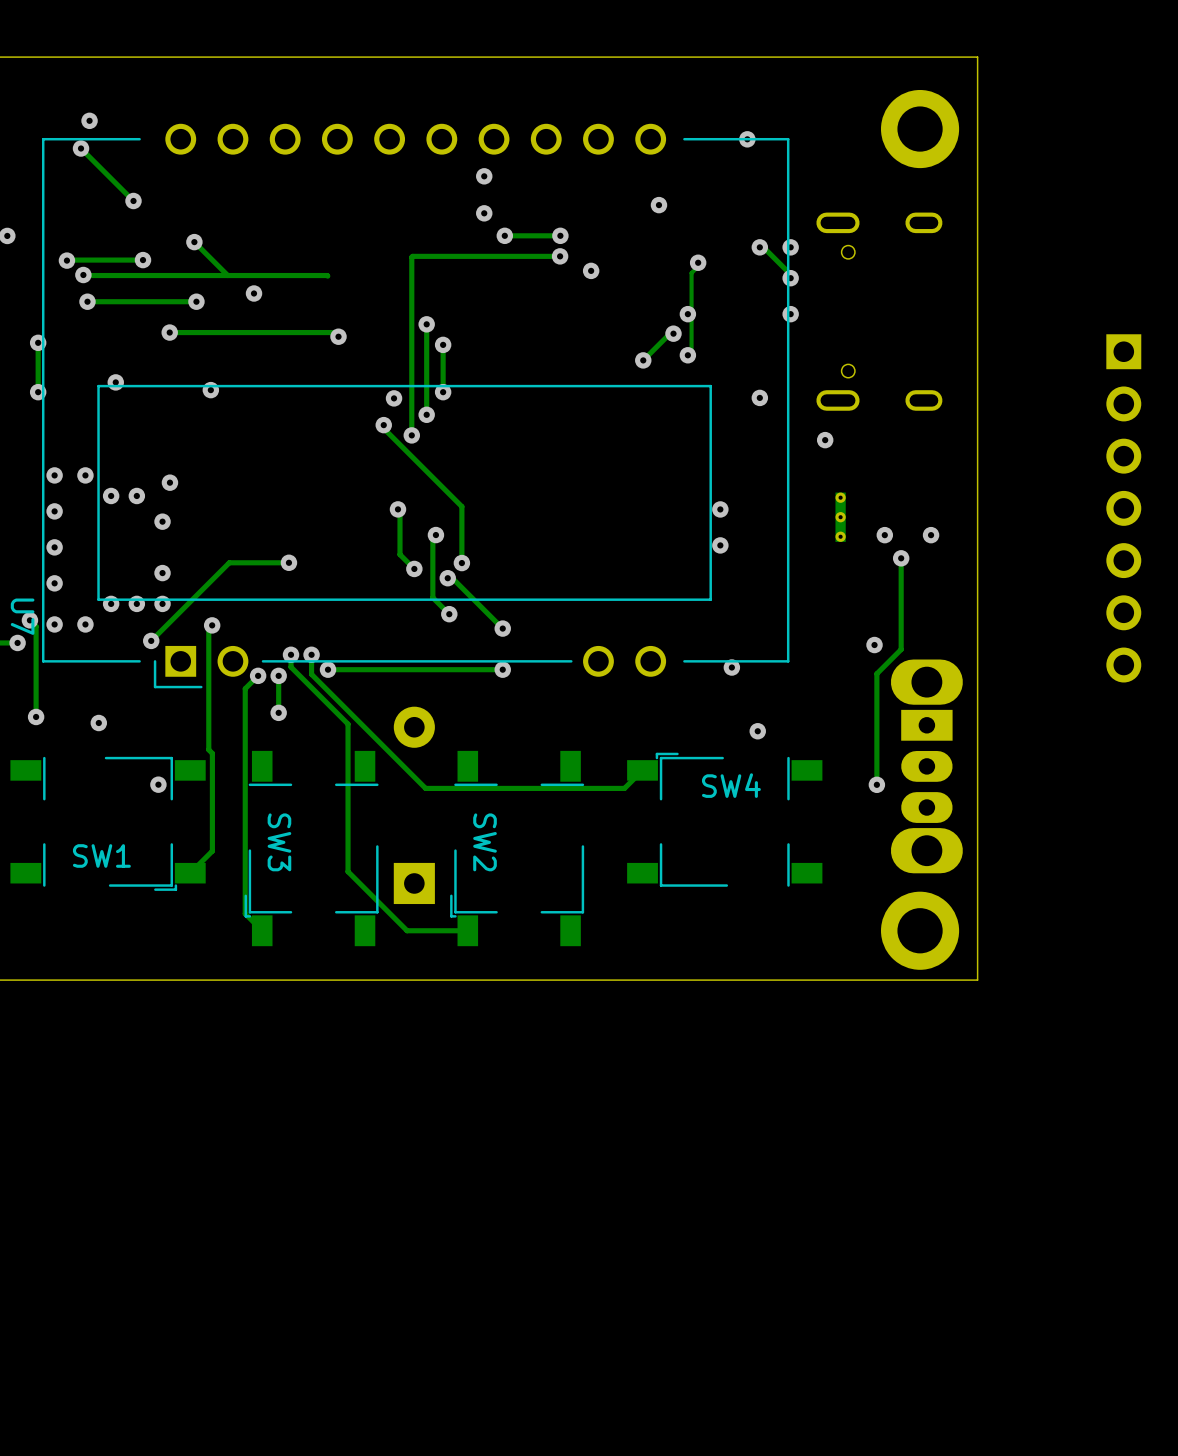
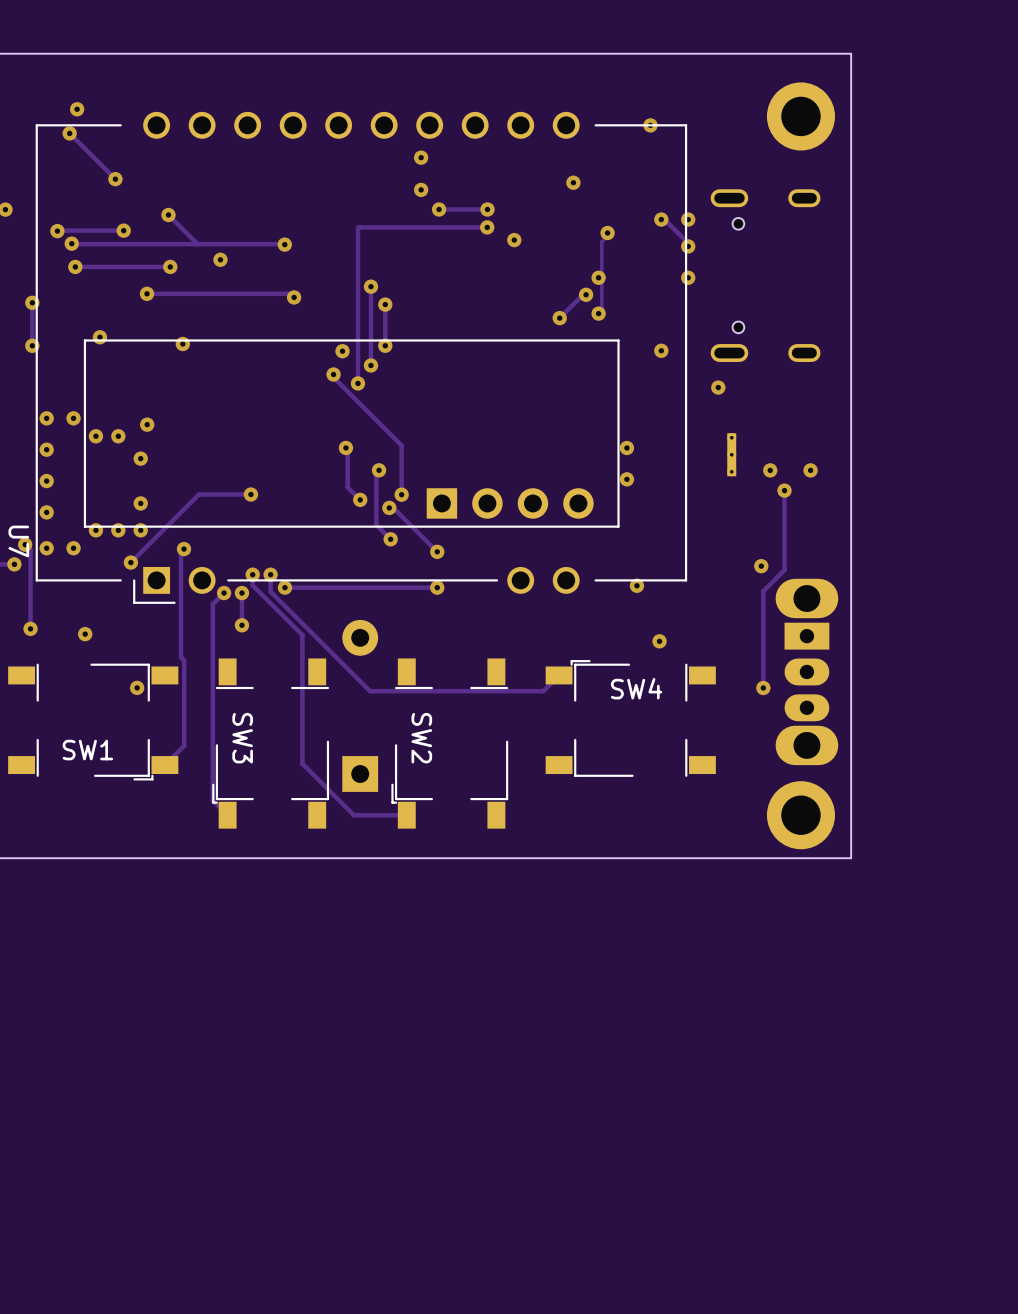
via: none -> (284, 244)
part: (1123, 508) -> none
part: none -> (510, 503)

